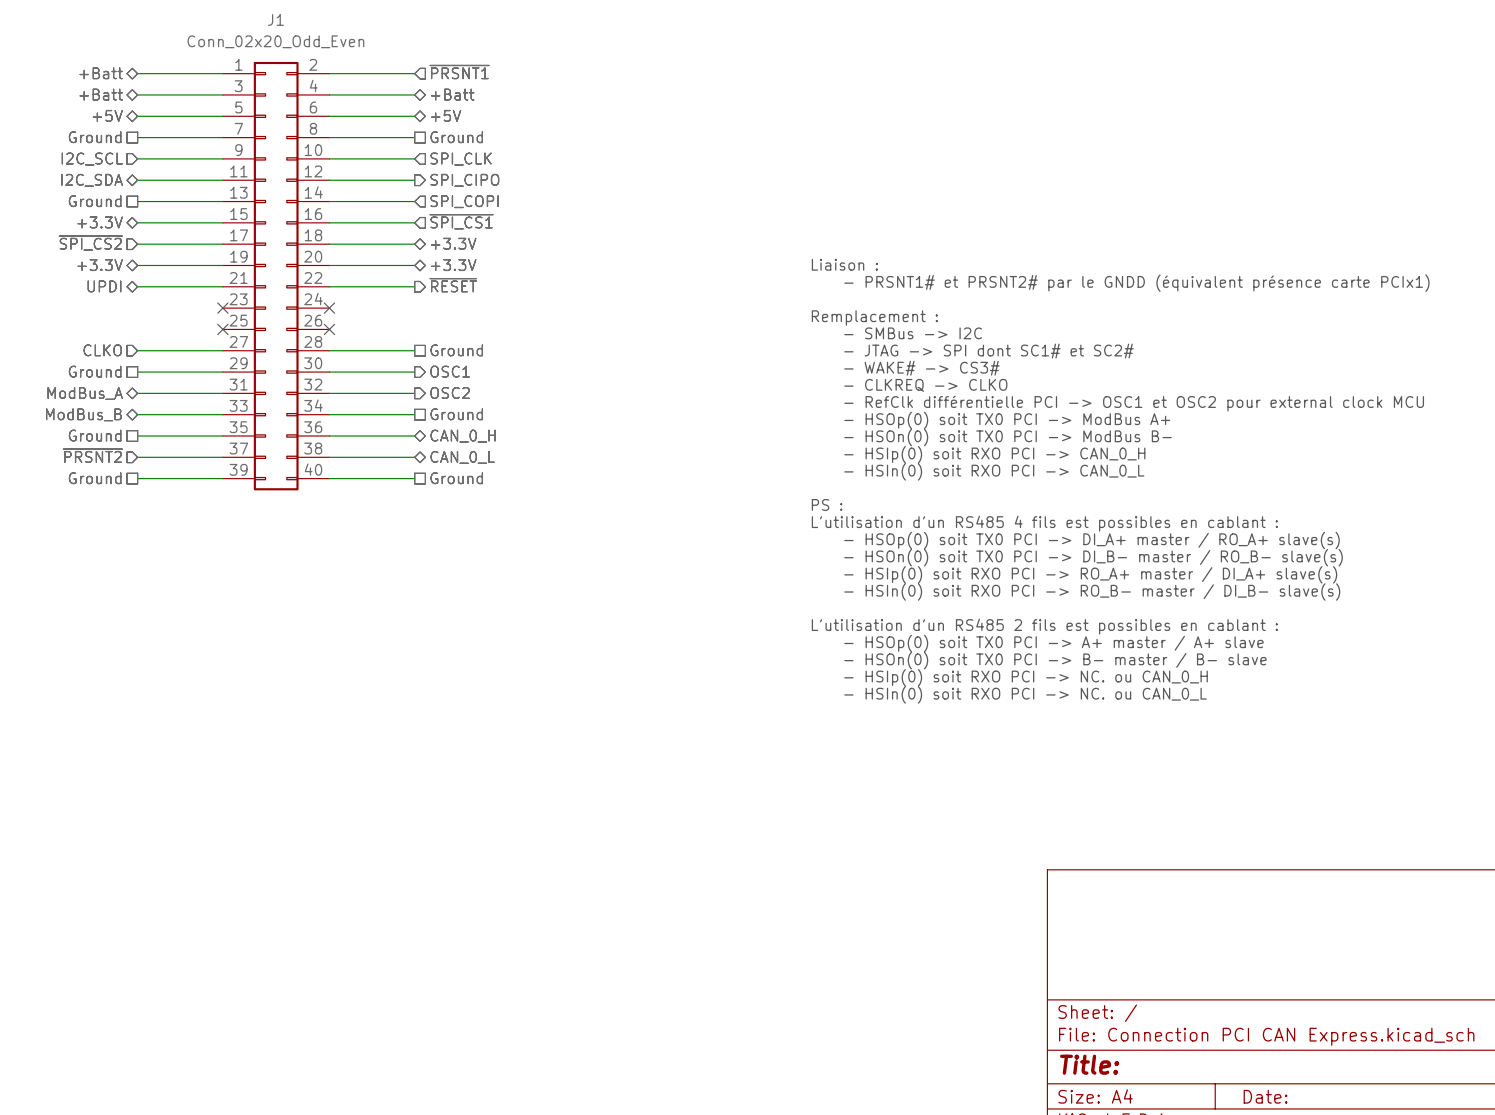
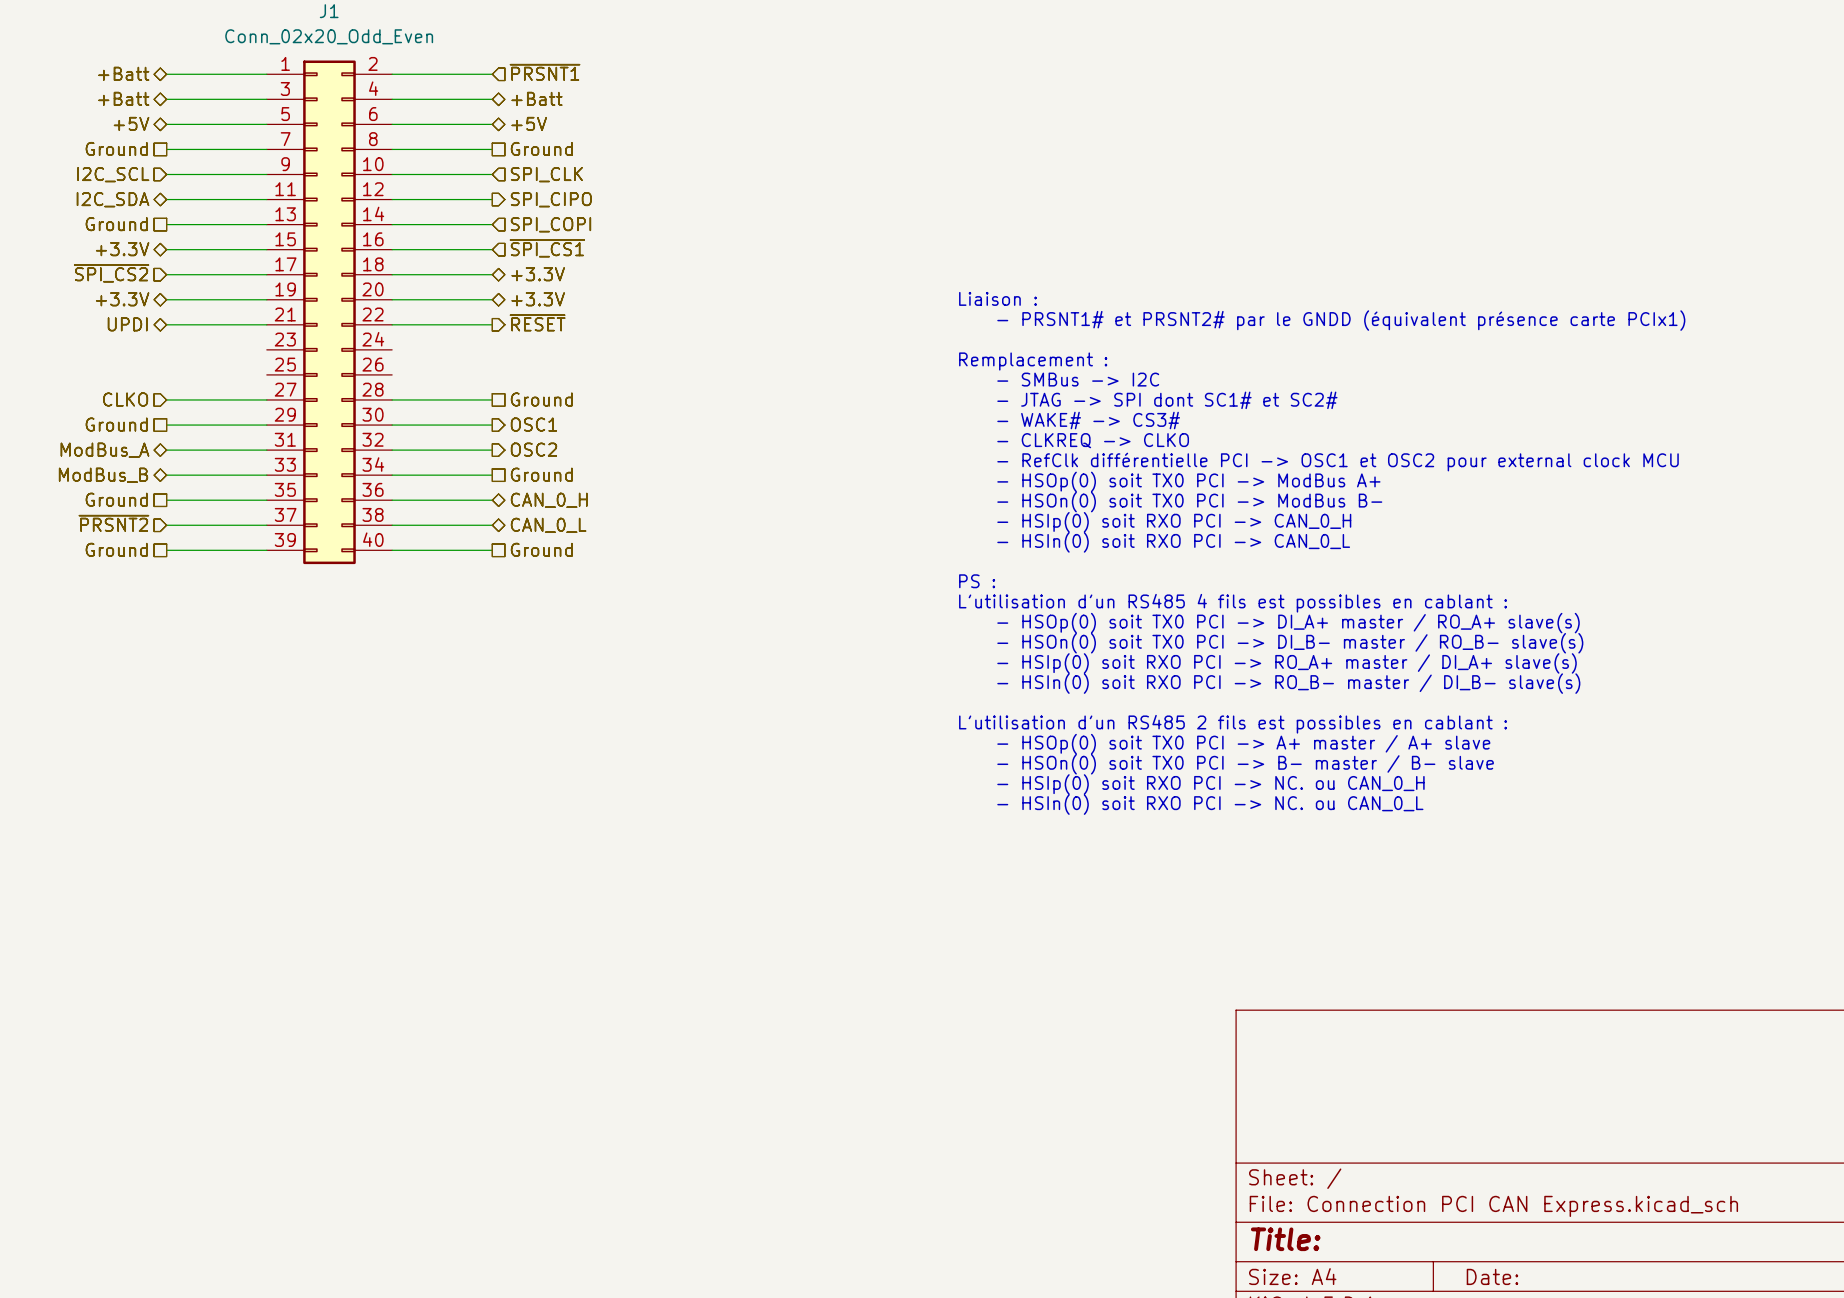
no-connect mark: (222, 308) -> none
no-connect mark: (329, 308) -> none
no-connect mark: (222, 329) -> none
no-connect mark: (329, 329) -> none

